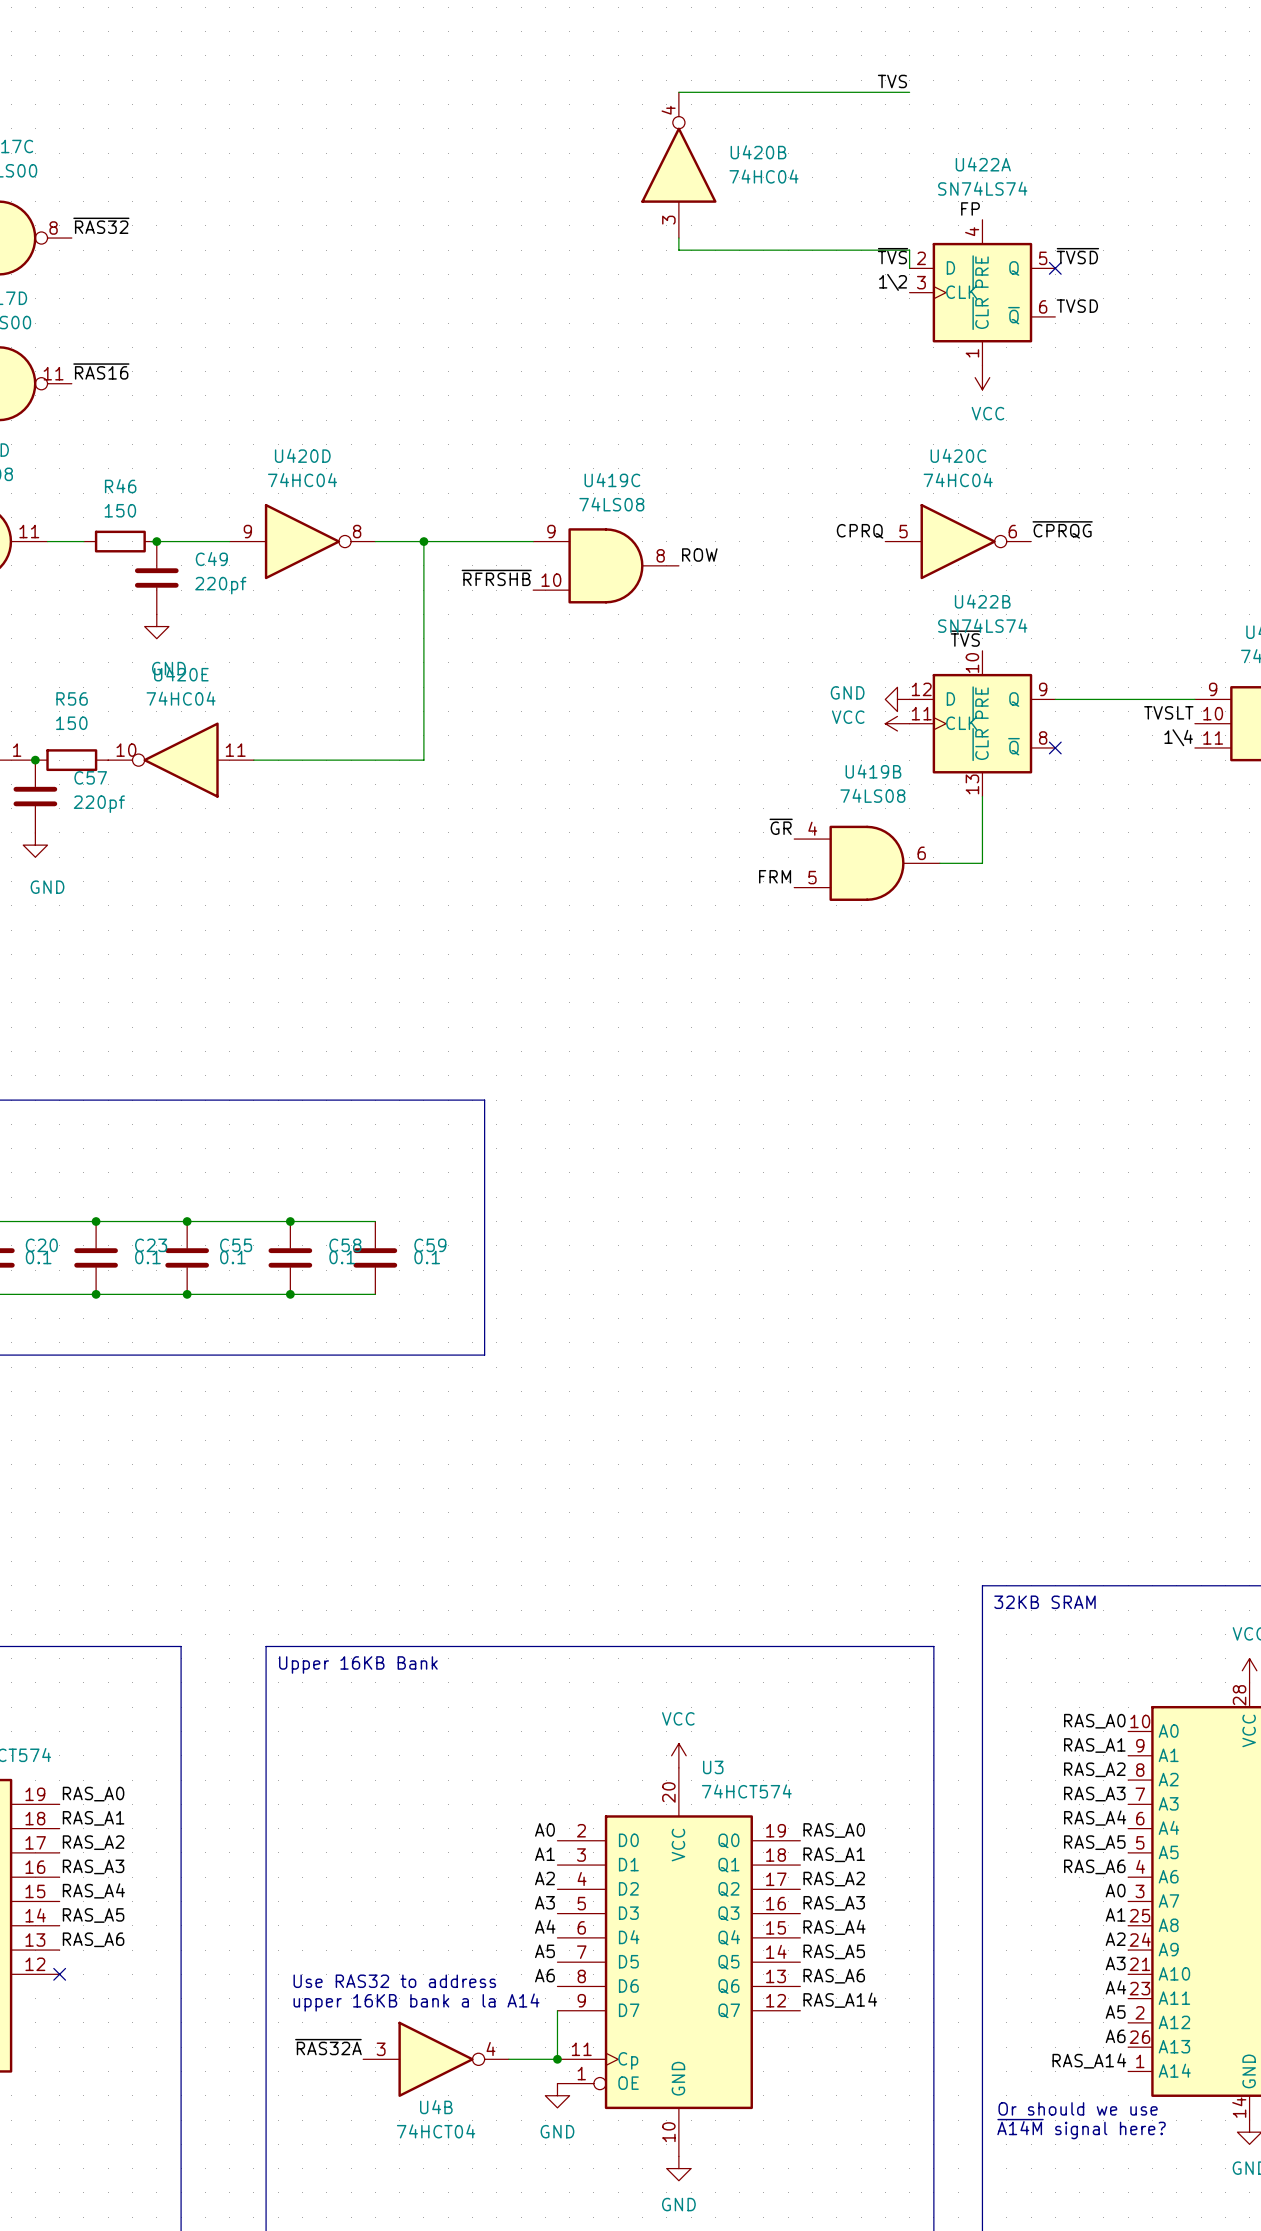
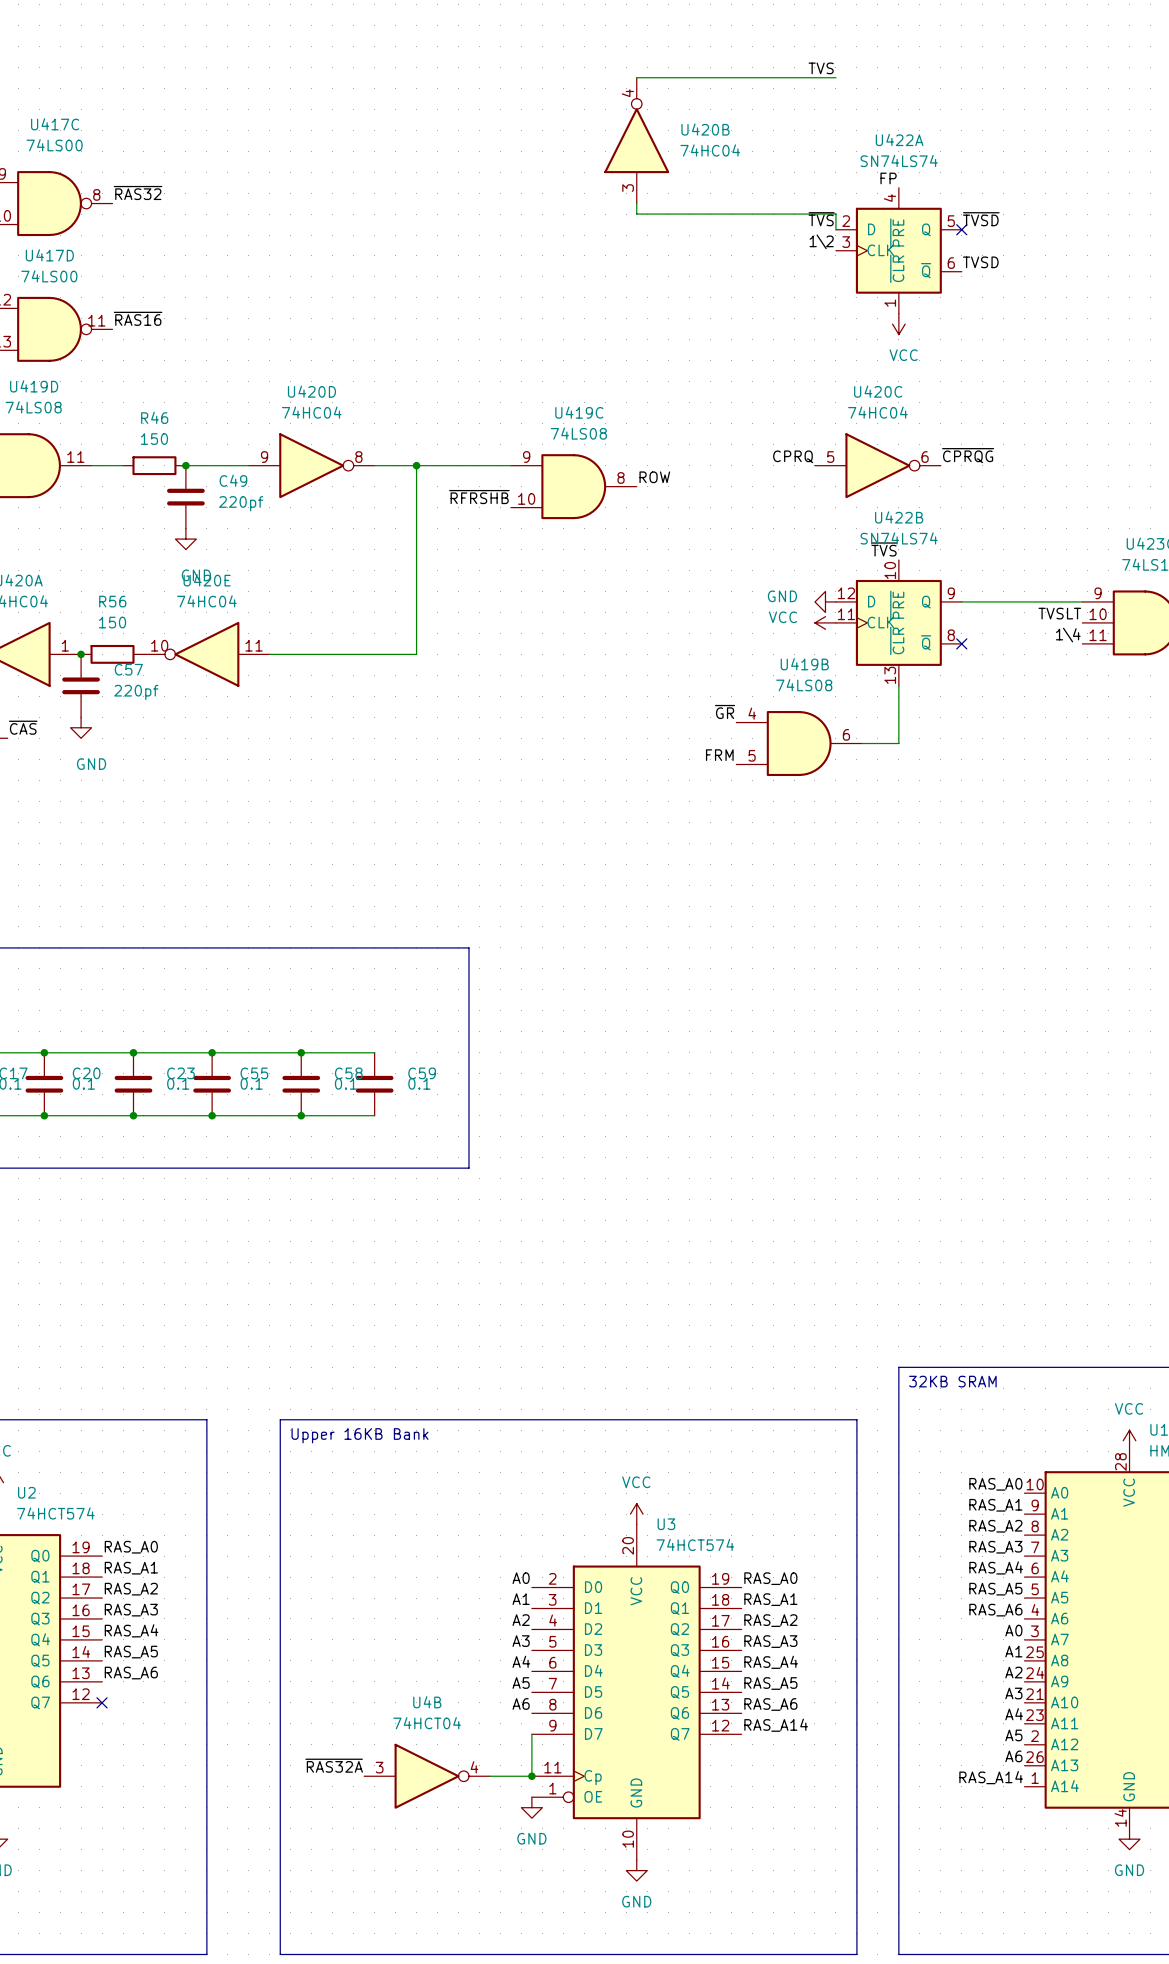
text: Use RAS32 to address (394, 1981) -> none
text: upper 16KB bank a la A14 (416, 2002) -> none
U4B name position: U4B (436, 2107) -> U4B (427, 1702)
text: Or should we use (1078, 2108) -> none
text: ~{A14M} signal here? (1081, 2129) -> none
U4B value position: 74HCT04 (436, 2131) -> 74HCT04 (427, 1723)

